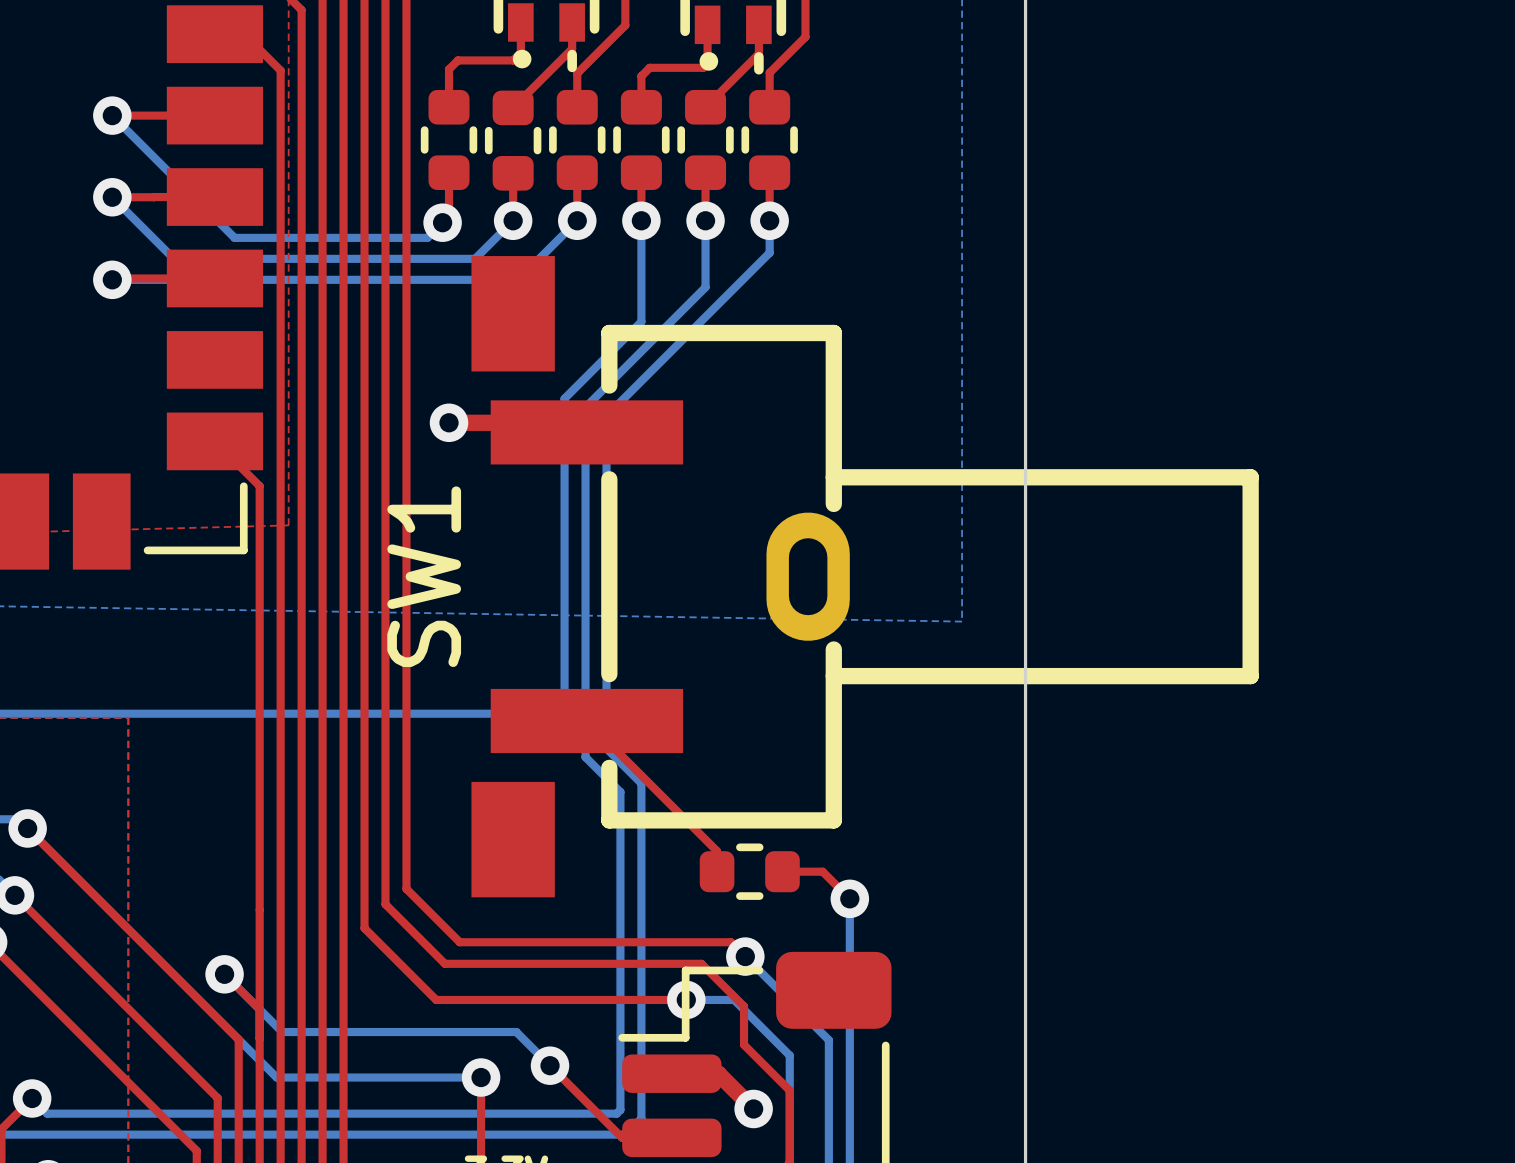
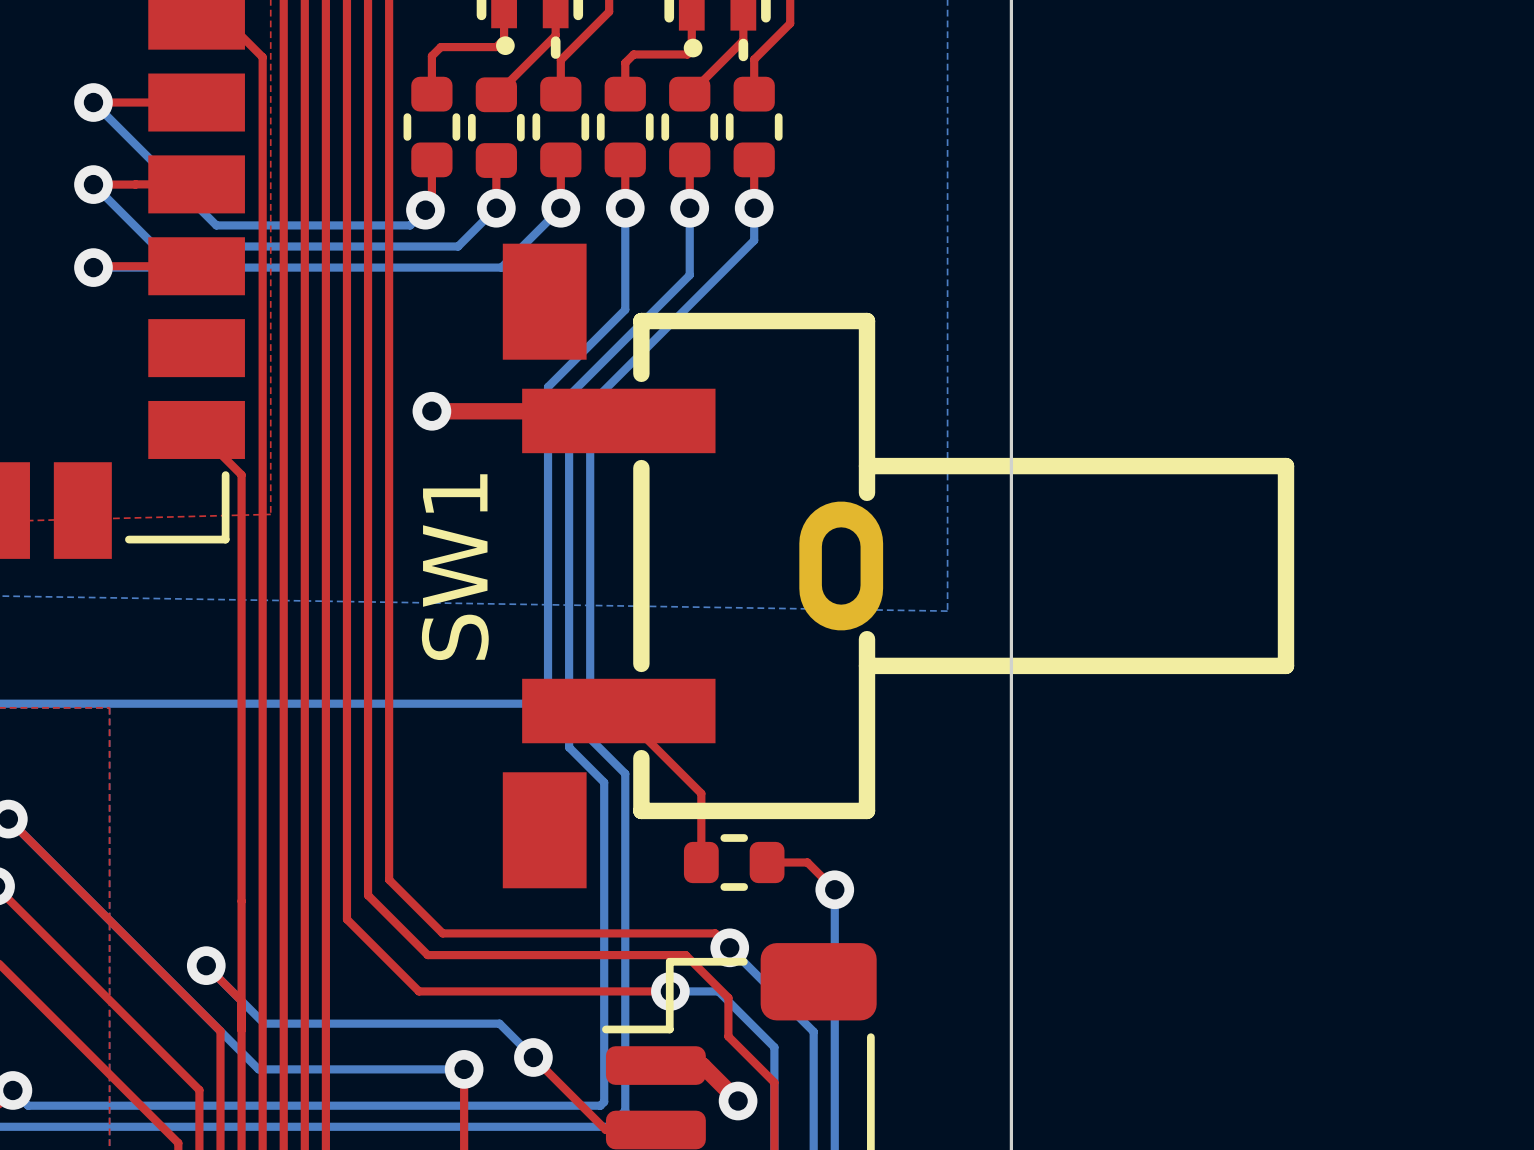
SW1 position: (865, 576) -> (898, 565)
top track: (586, 720) (717, 851) -> (618, 711) (701, 793) (701, 841)

